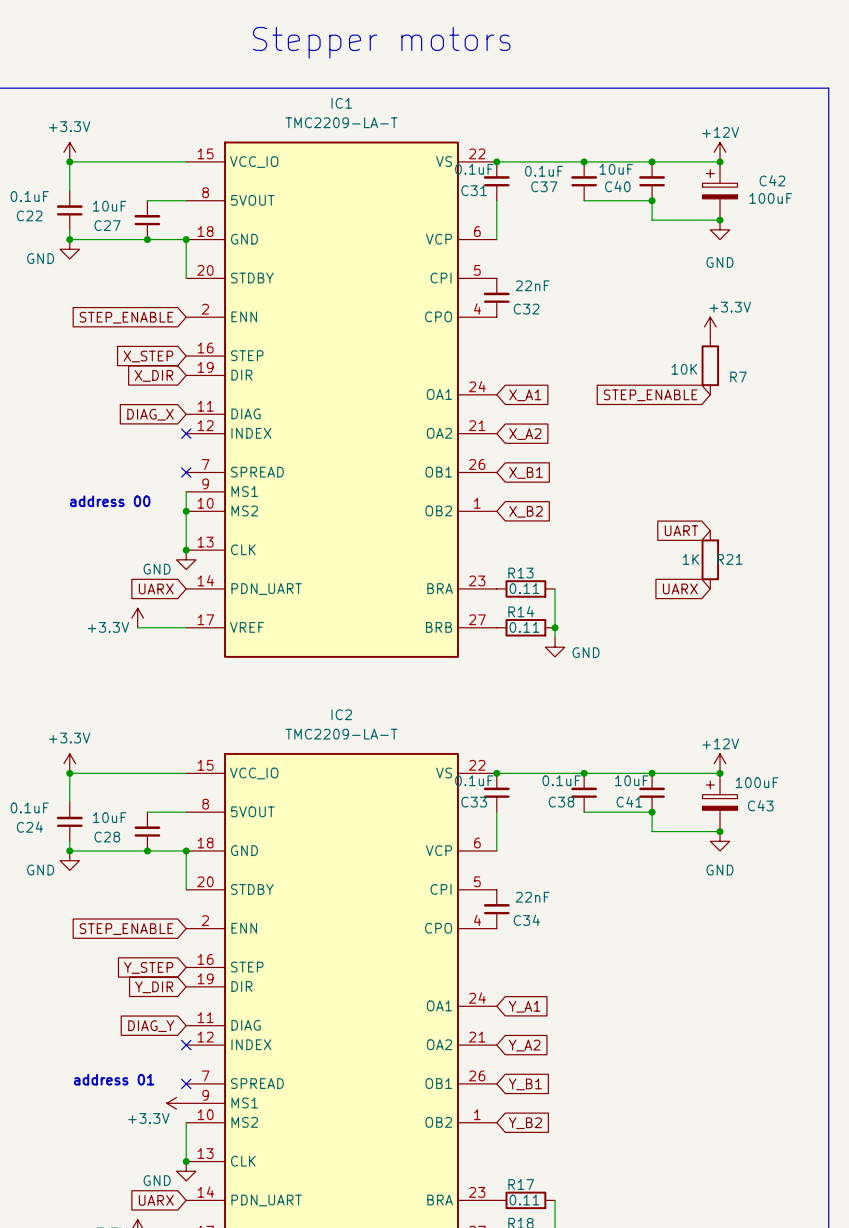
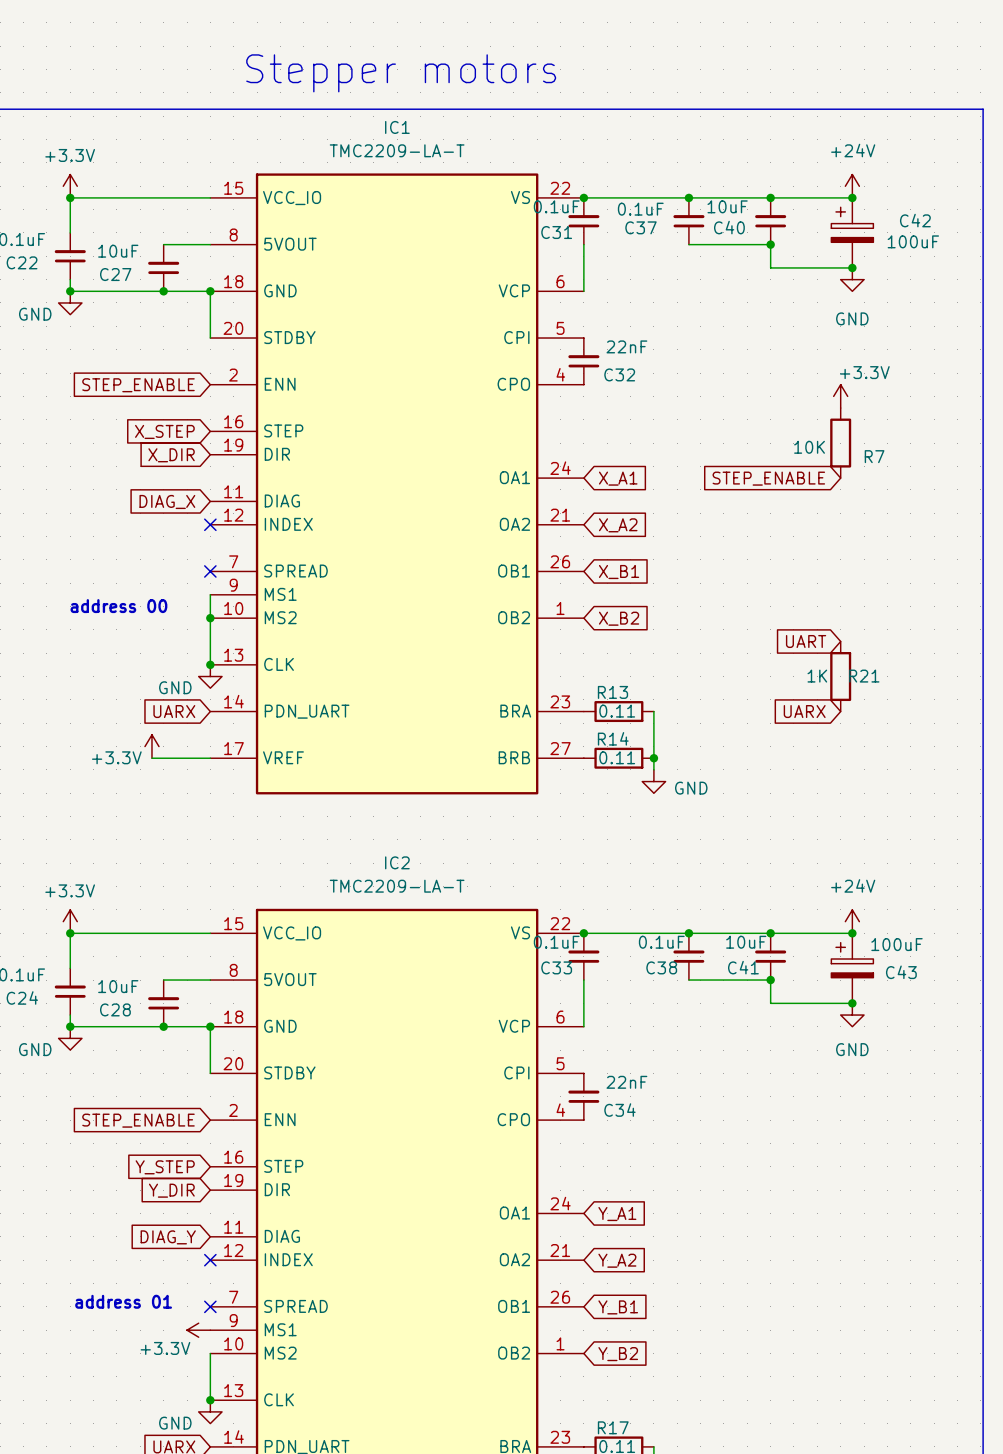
text position: Stepper motors (381, 42) -> Stepper motors (401, 73)
power symbol: +12V (720, 152) -> +24V (852, 186)
power symbol: +12V (720, 763) -> +24V (852, 921)

